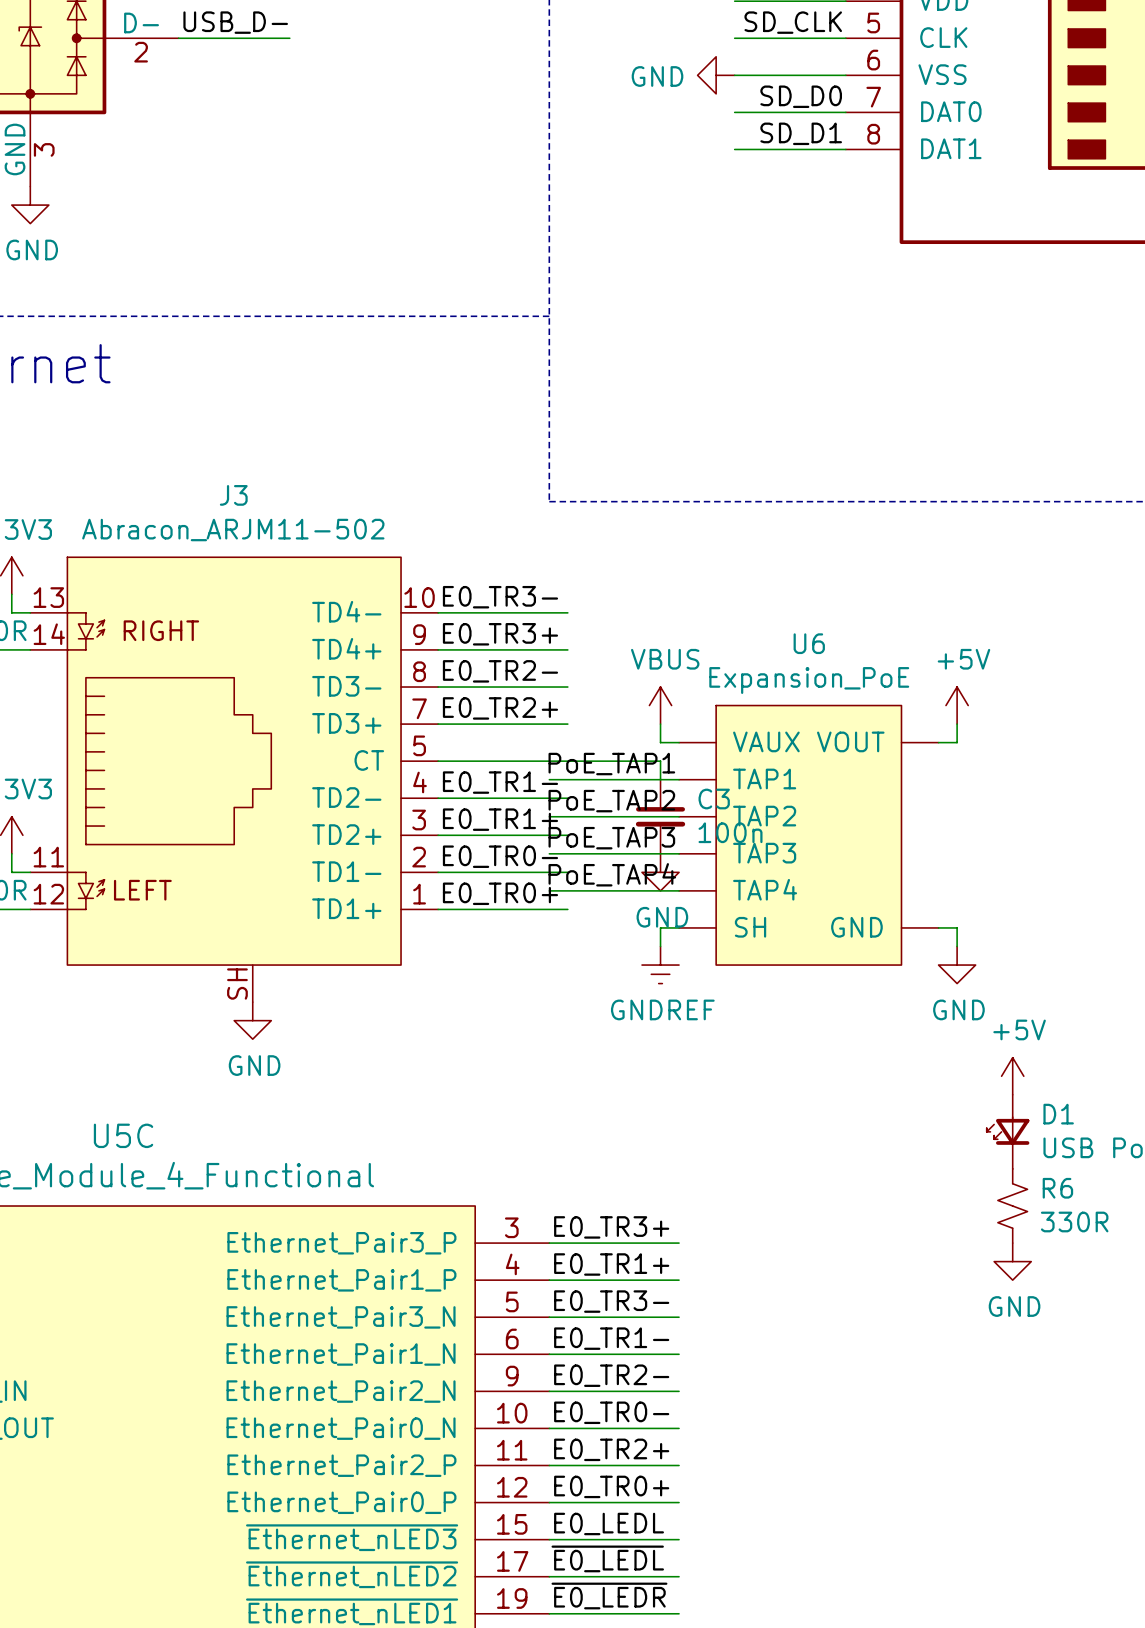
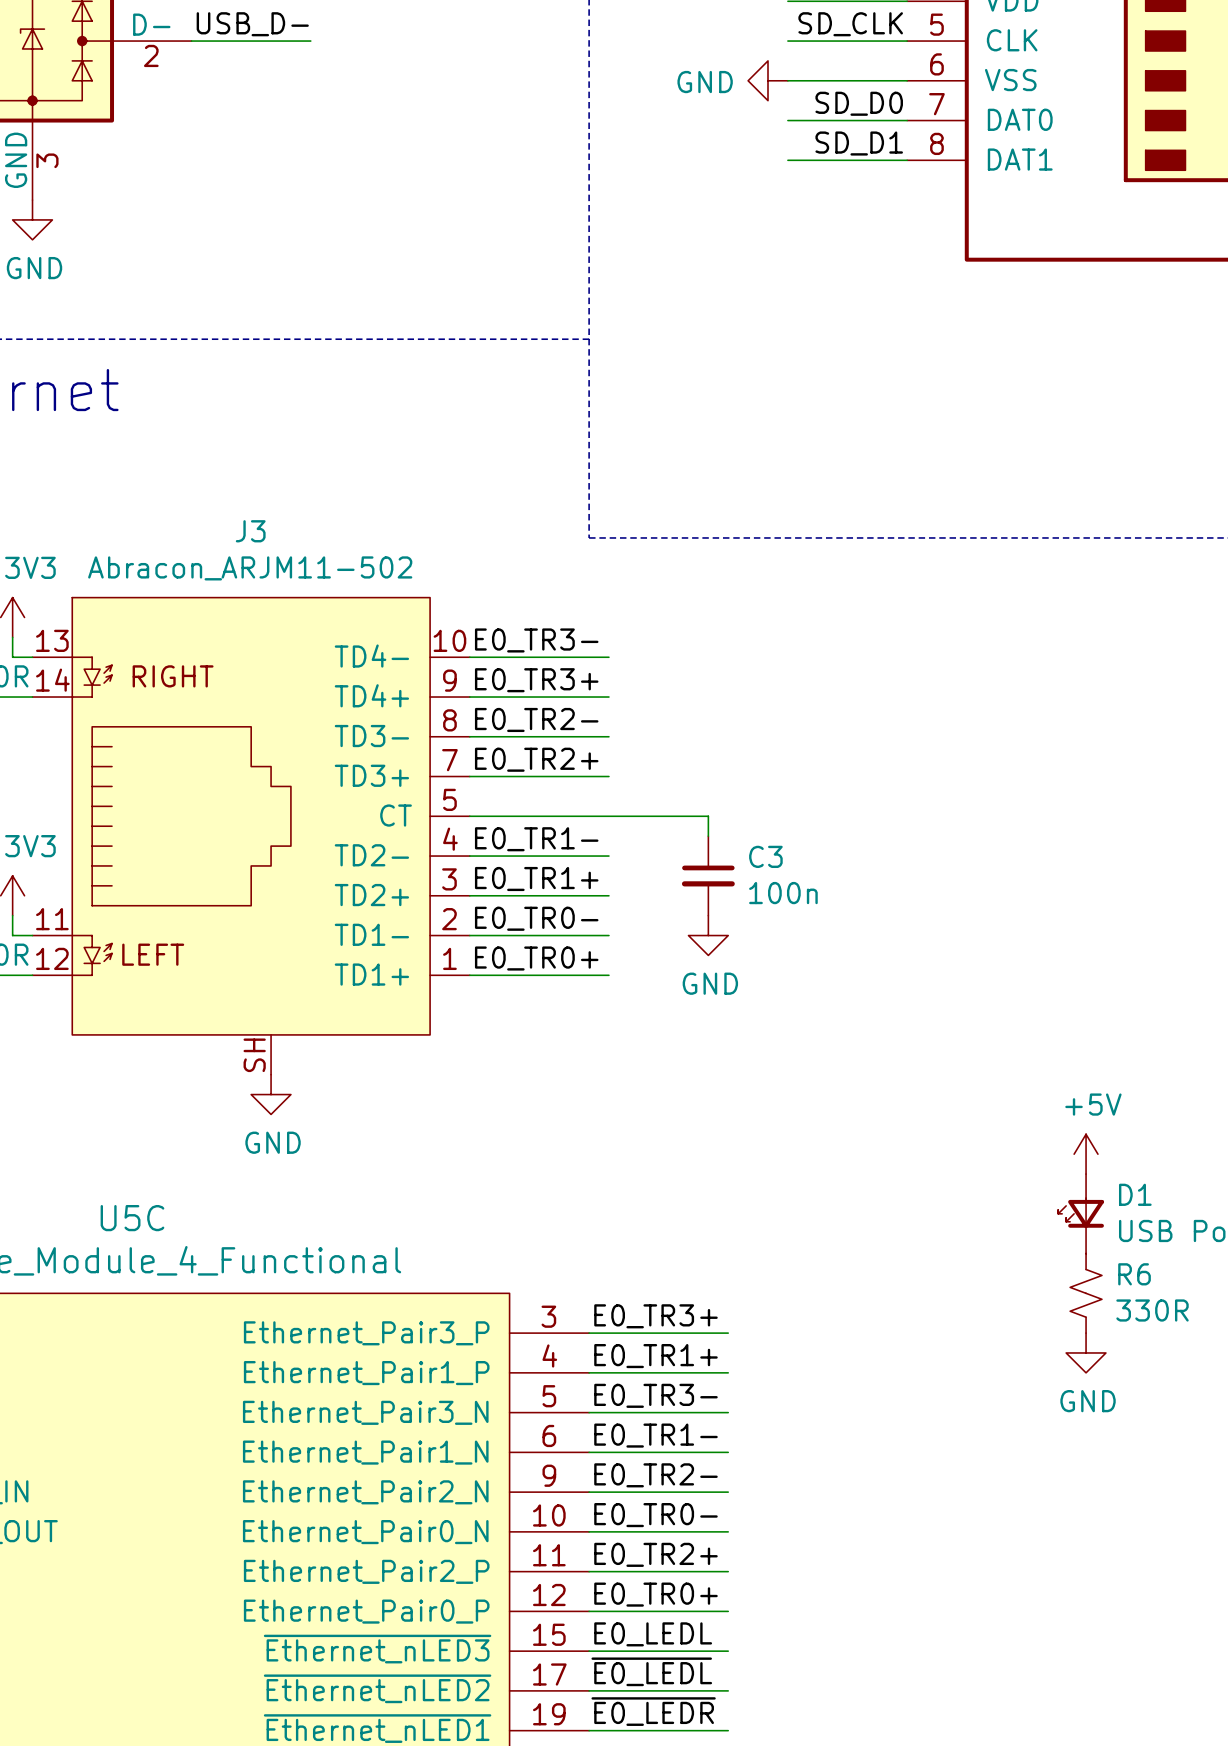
power symbol: VBUS (660, 705) -> none
power symbol: +5V (957, 705) -> none
wire: (660, 724) (660, 742) (679, 742) -> none
wire: (957, 724) (957, 742) (938, 742) -> none
label: PoE_TAP1 (611, 764) -> none
wire: (549, 779) (679, 779) -> none
label: PoE_TAP2 (611, 801) -> none
wire: (549, 816) (679, 816) -> none
U6: Expansion_PoE (808, 835) -> none
label: PoE_TAP3 (611, 838) -> none
wire: (549, 853) (679, 853) -> none
label: PoE_TAP4 (612, 874) -> none
wire: (549, 890) (679, 890) -> none
wire: (679, 927) (660, 927) (660, 946) -> none
wire: (938, 927) (957, 927) (957, 946) -> none
power symbol: GNDREF (660, 965) -> none
power symbol: GND (957, 965) -> none

